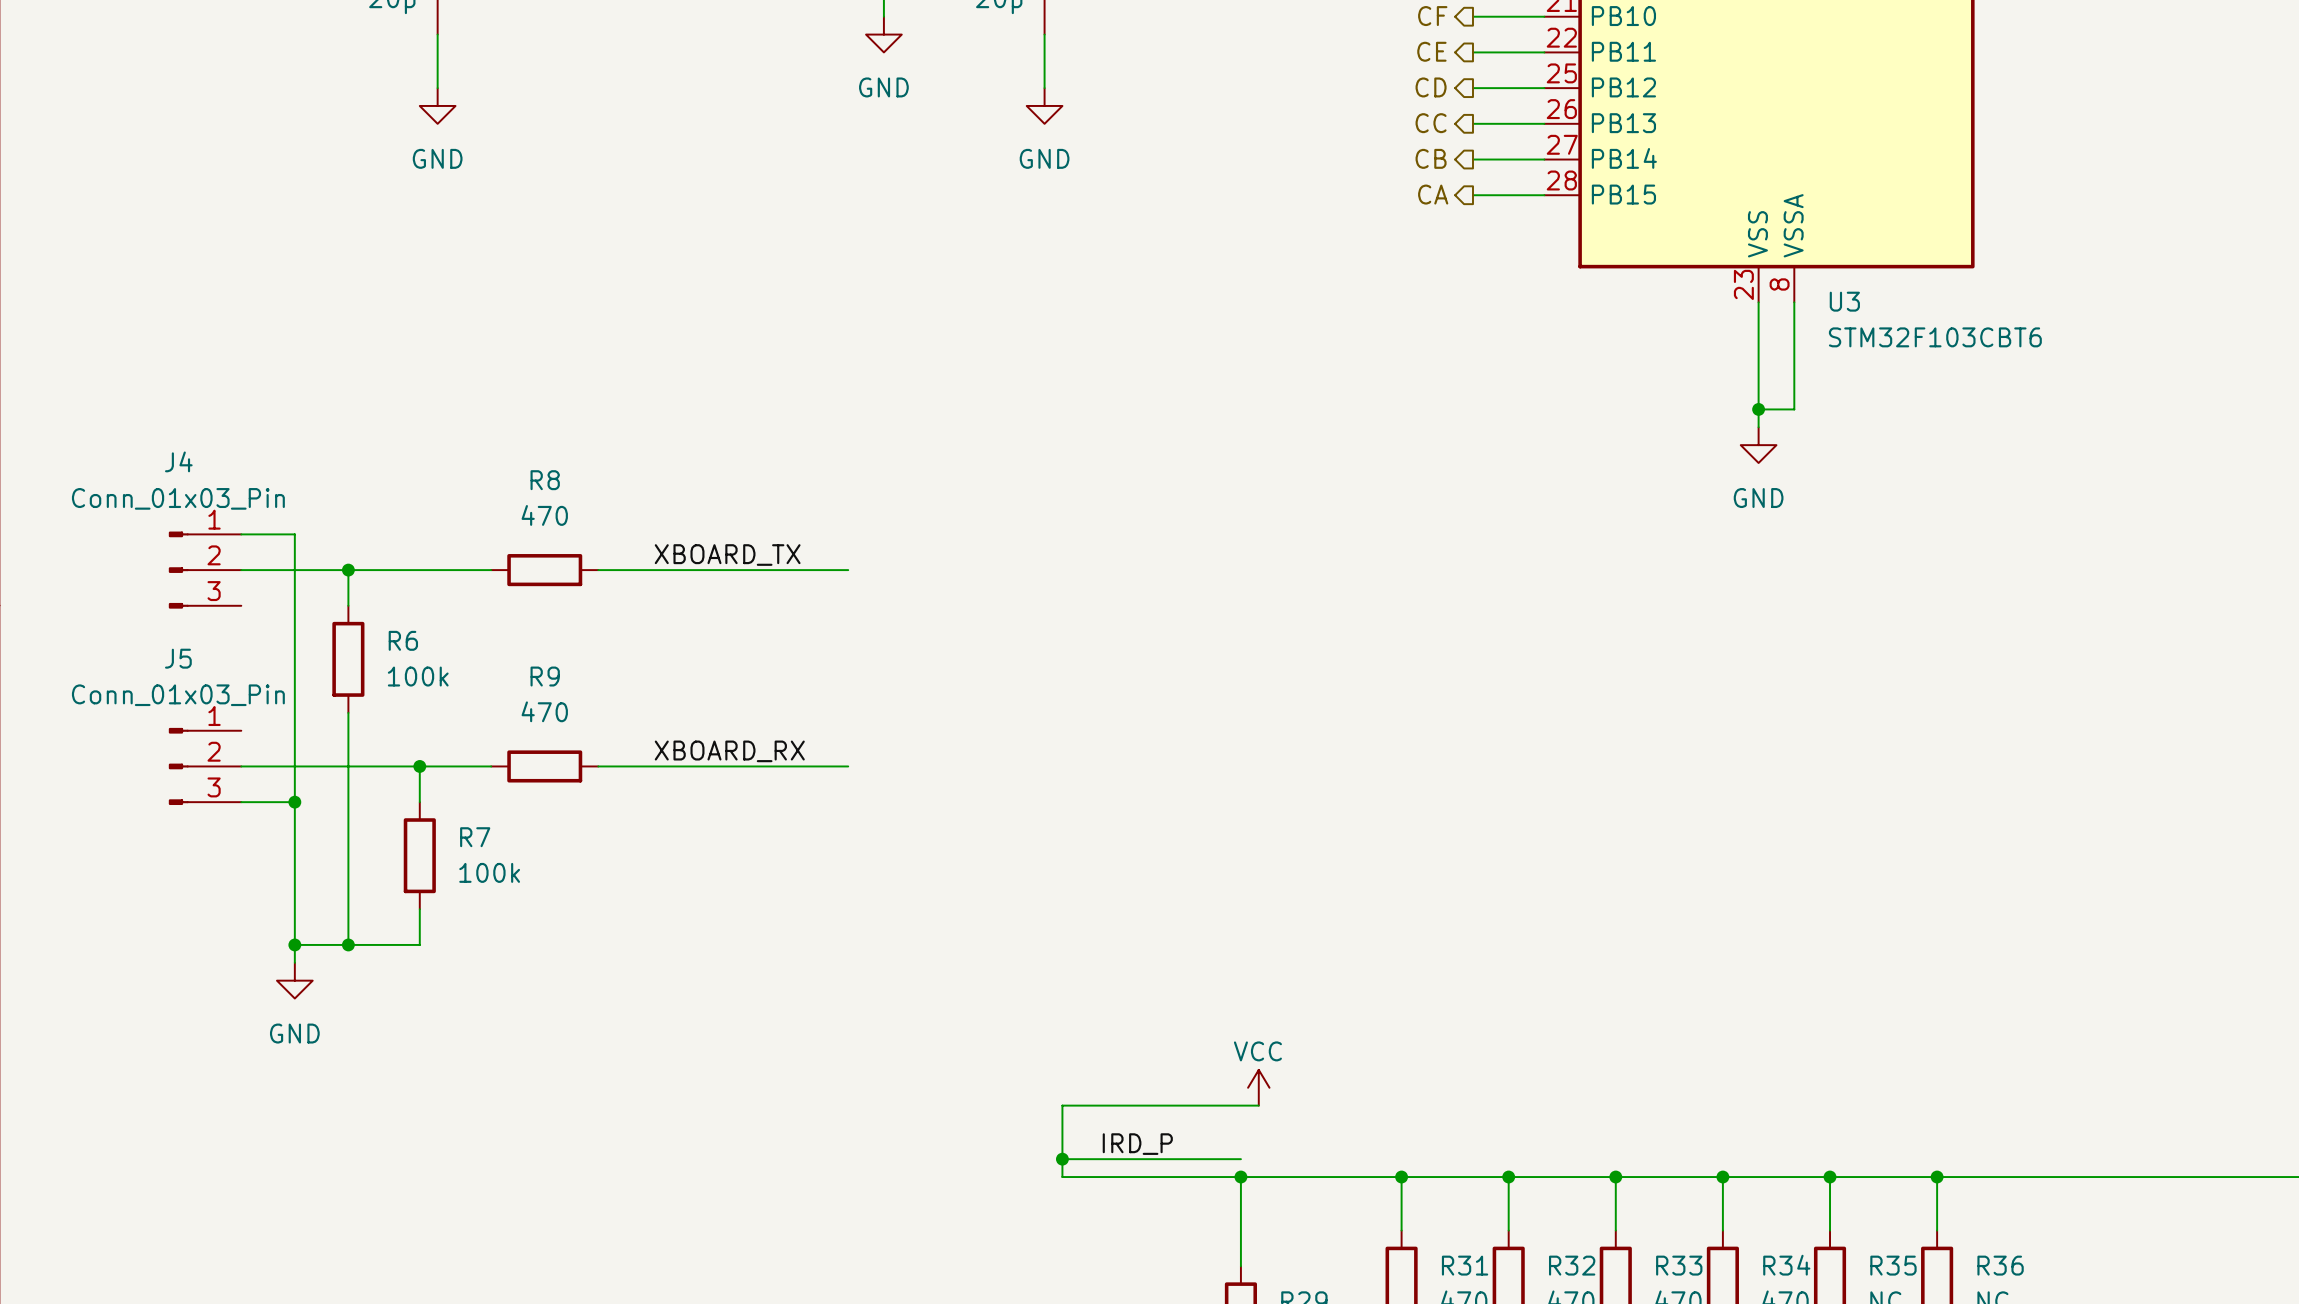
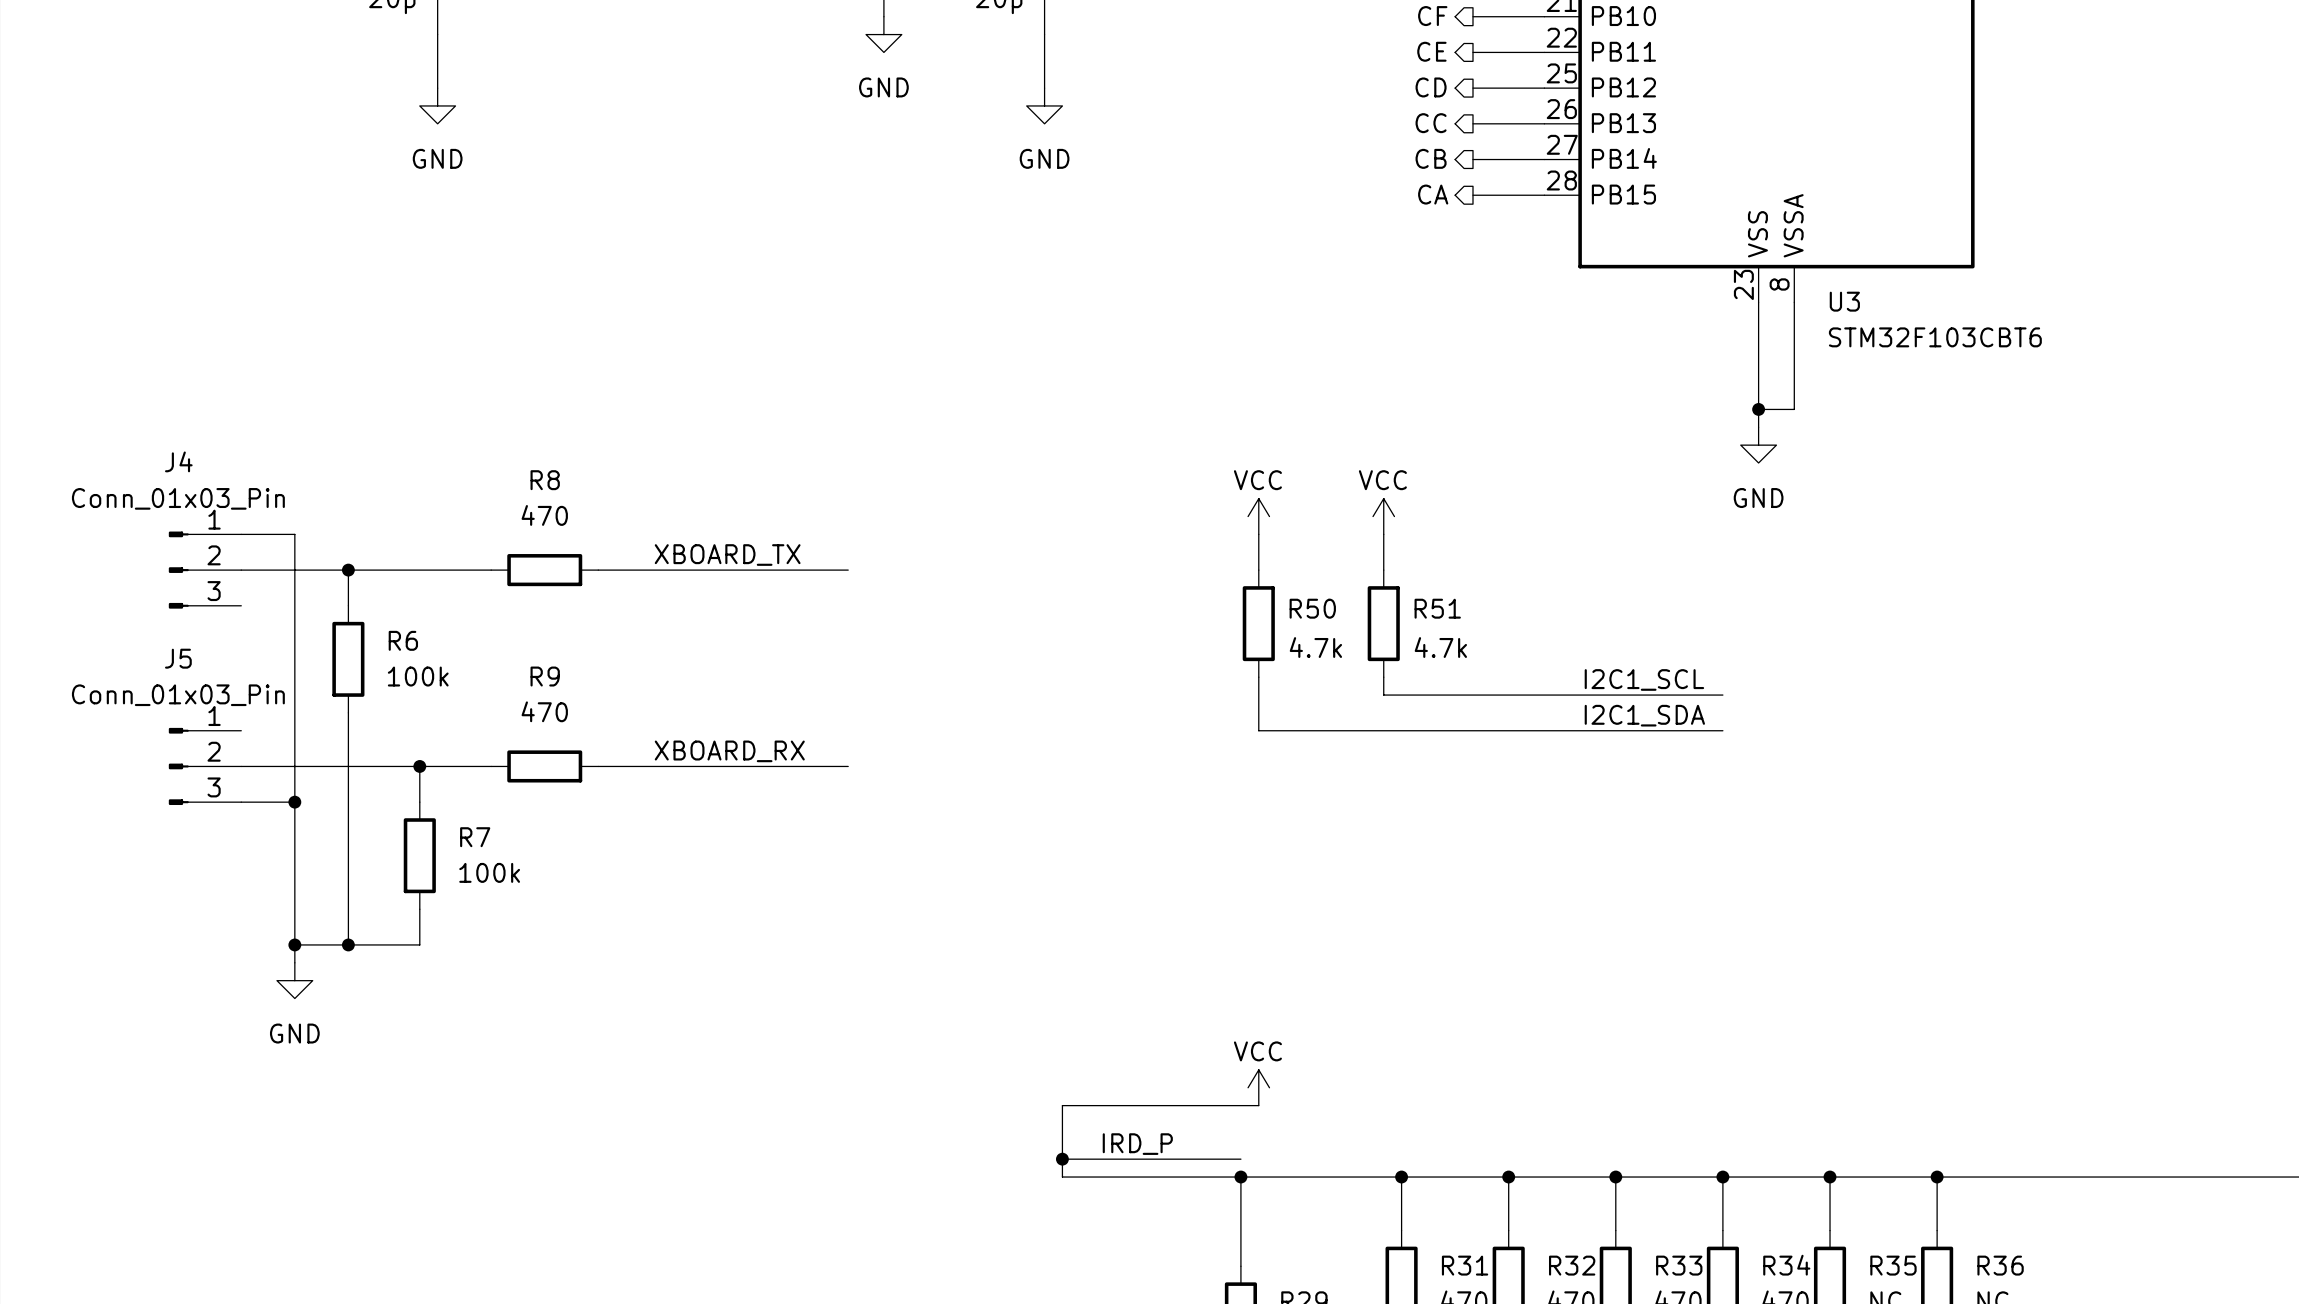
power symbol: none -> VCC (1258, 516)
power symbol: none -> VCC (1383, 516)
wire: none -> (1258, 534) (1258, 570)
wire: none -> (1383, 534) (1383, 570)
R50: none -> 4.7k (1258, 623)
R51: none -> 4.7k (1383, 623)
wire: none -> (1258, 677) (1258, 730) (1722, 730)
wire: none -> (1383, 677) (1383, 695) (1722, 695)
label: none -> I2C1_SCL (1644, 679)
label: none -> I2C1_SDA (1644, 715)

